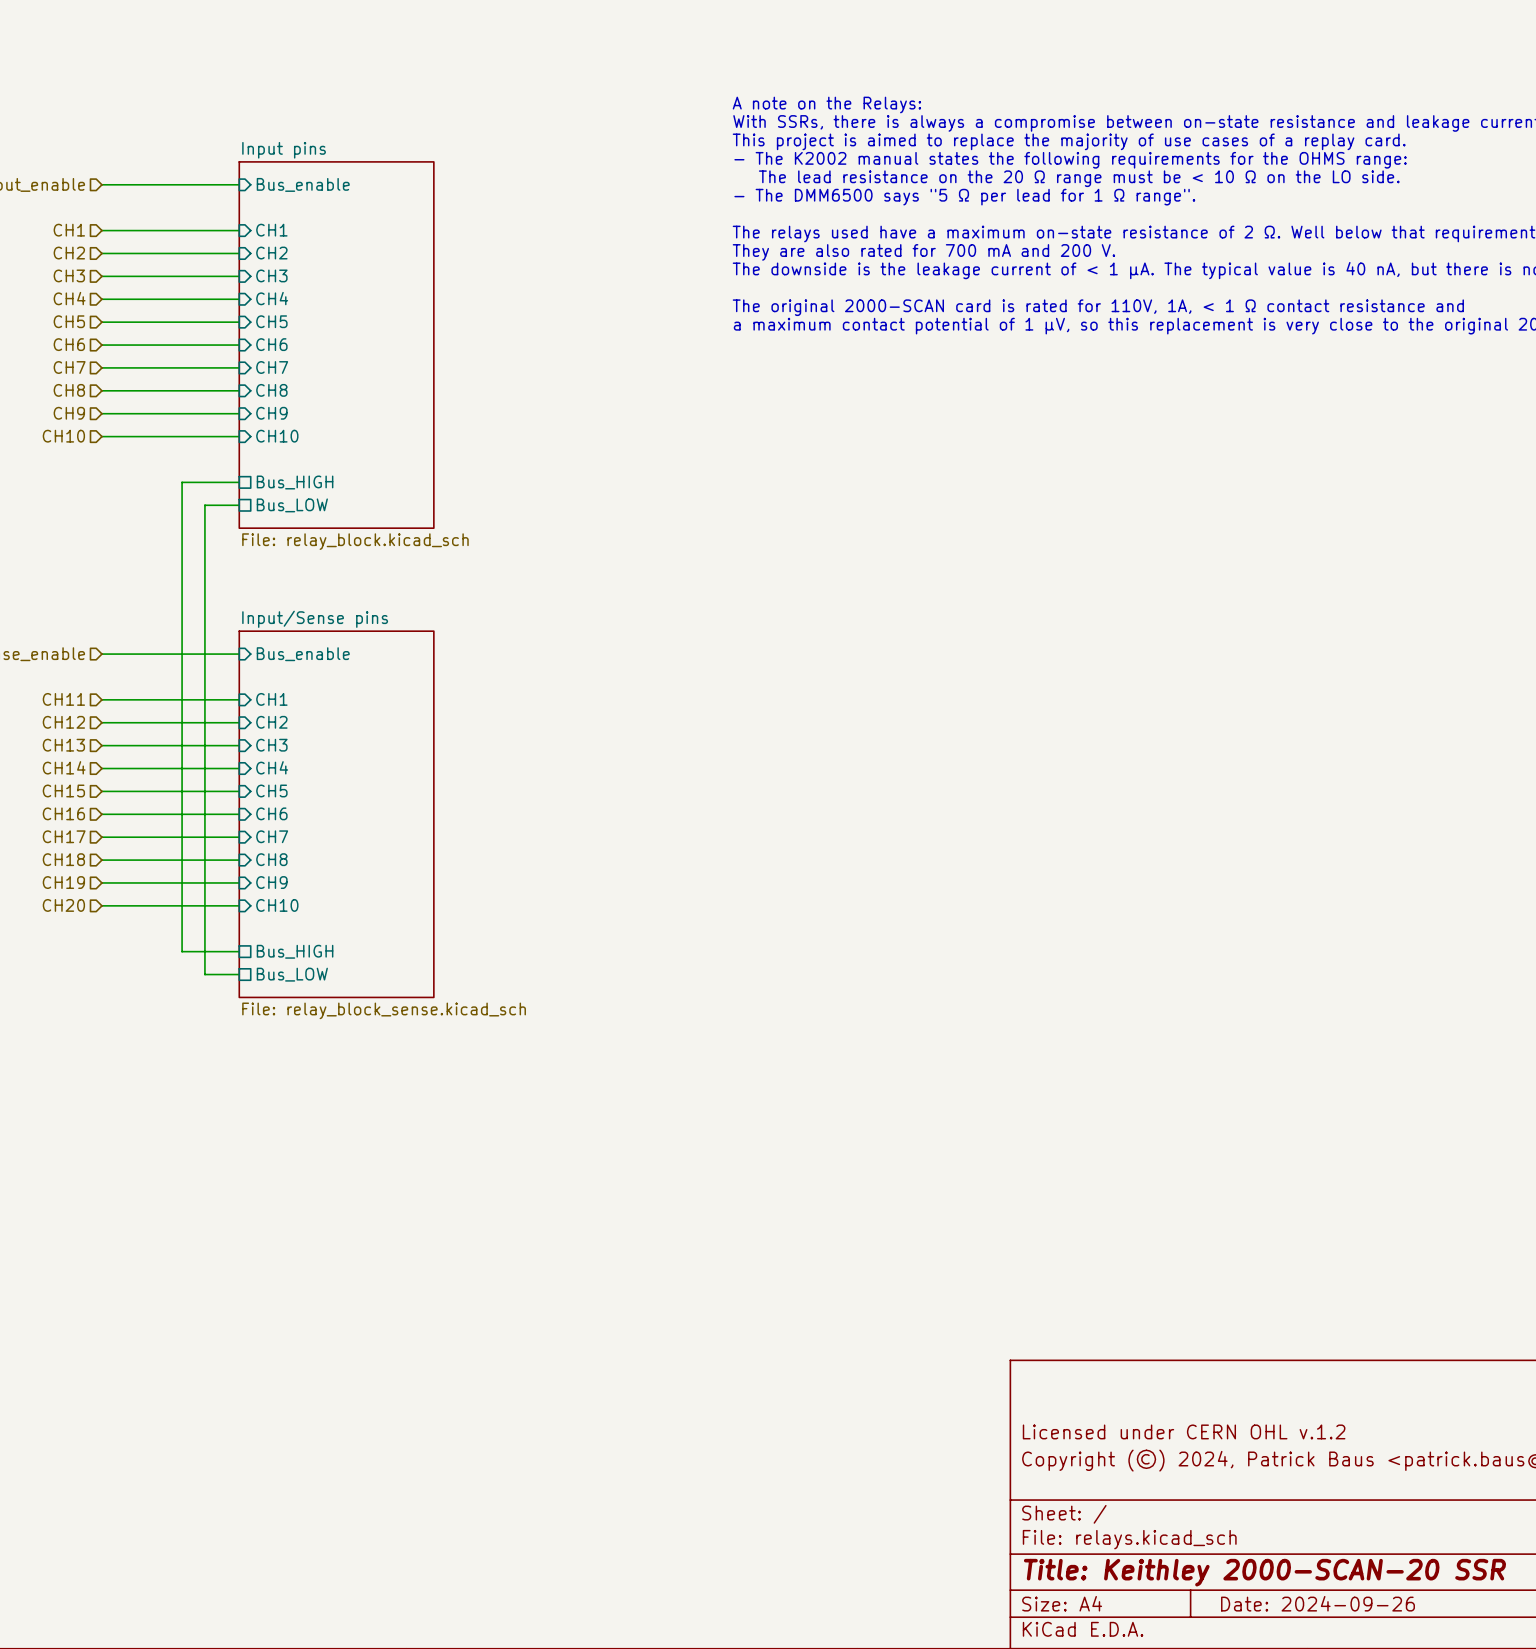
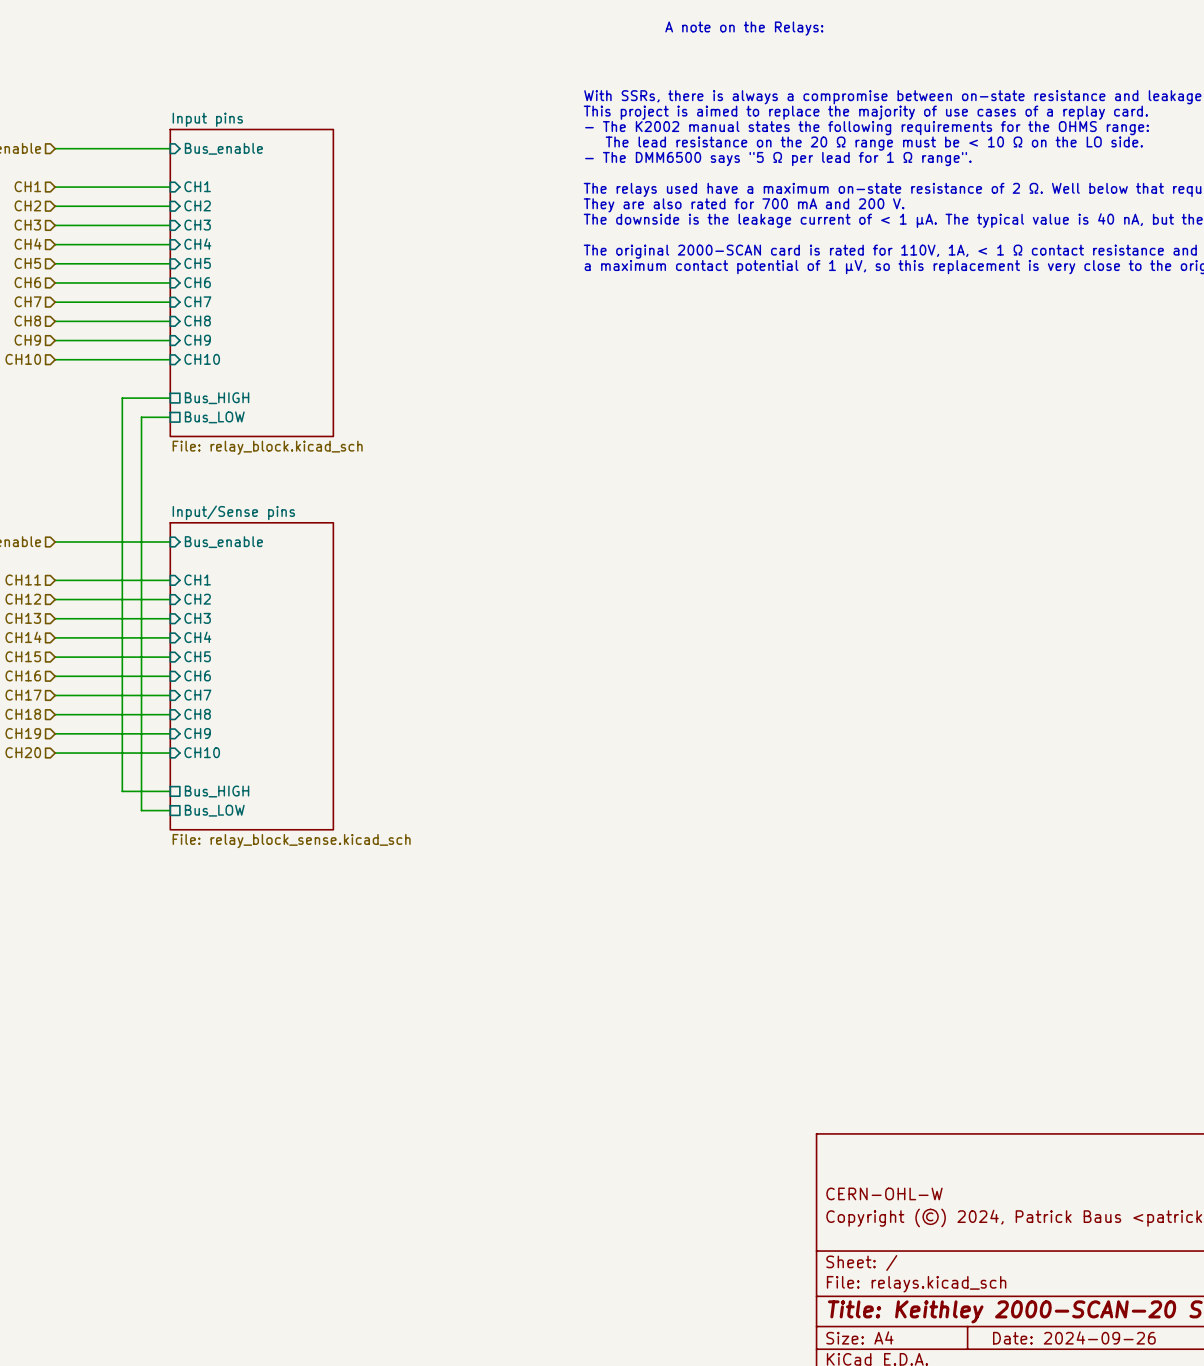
text position: A note on the Relays: (826, 105) -> A note on the Relays: (744, 28)
title block: Licensed under CERN OHL v.1.2 (1184, 1431) -> CERN-OHL-W (884, 1193)

